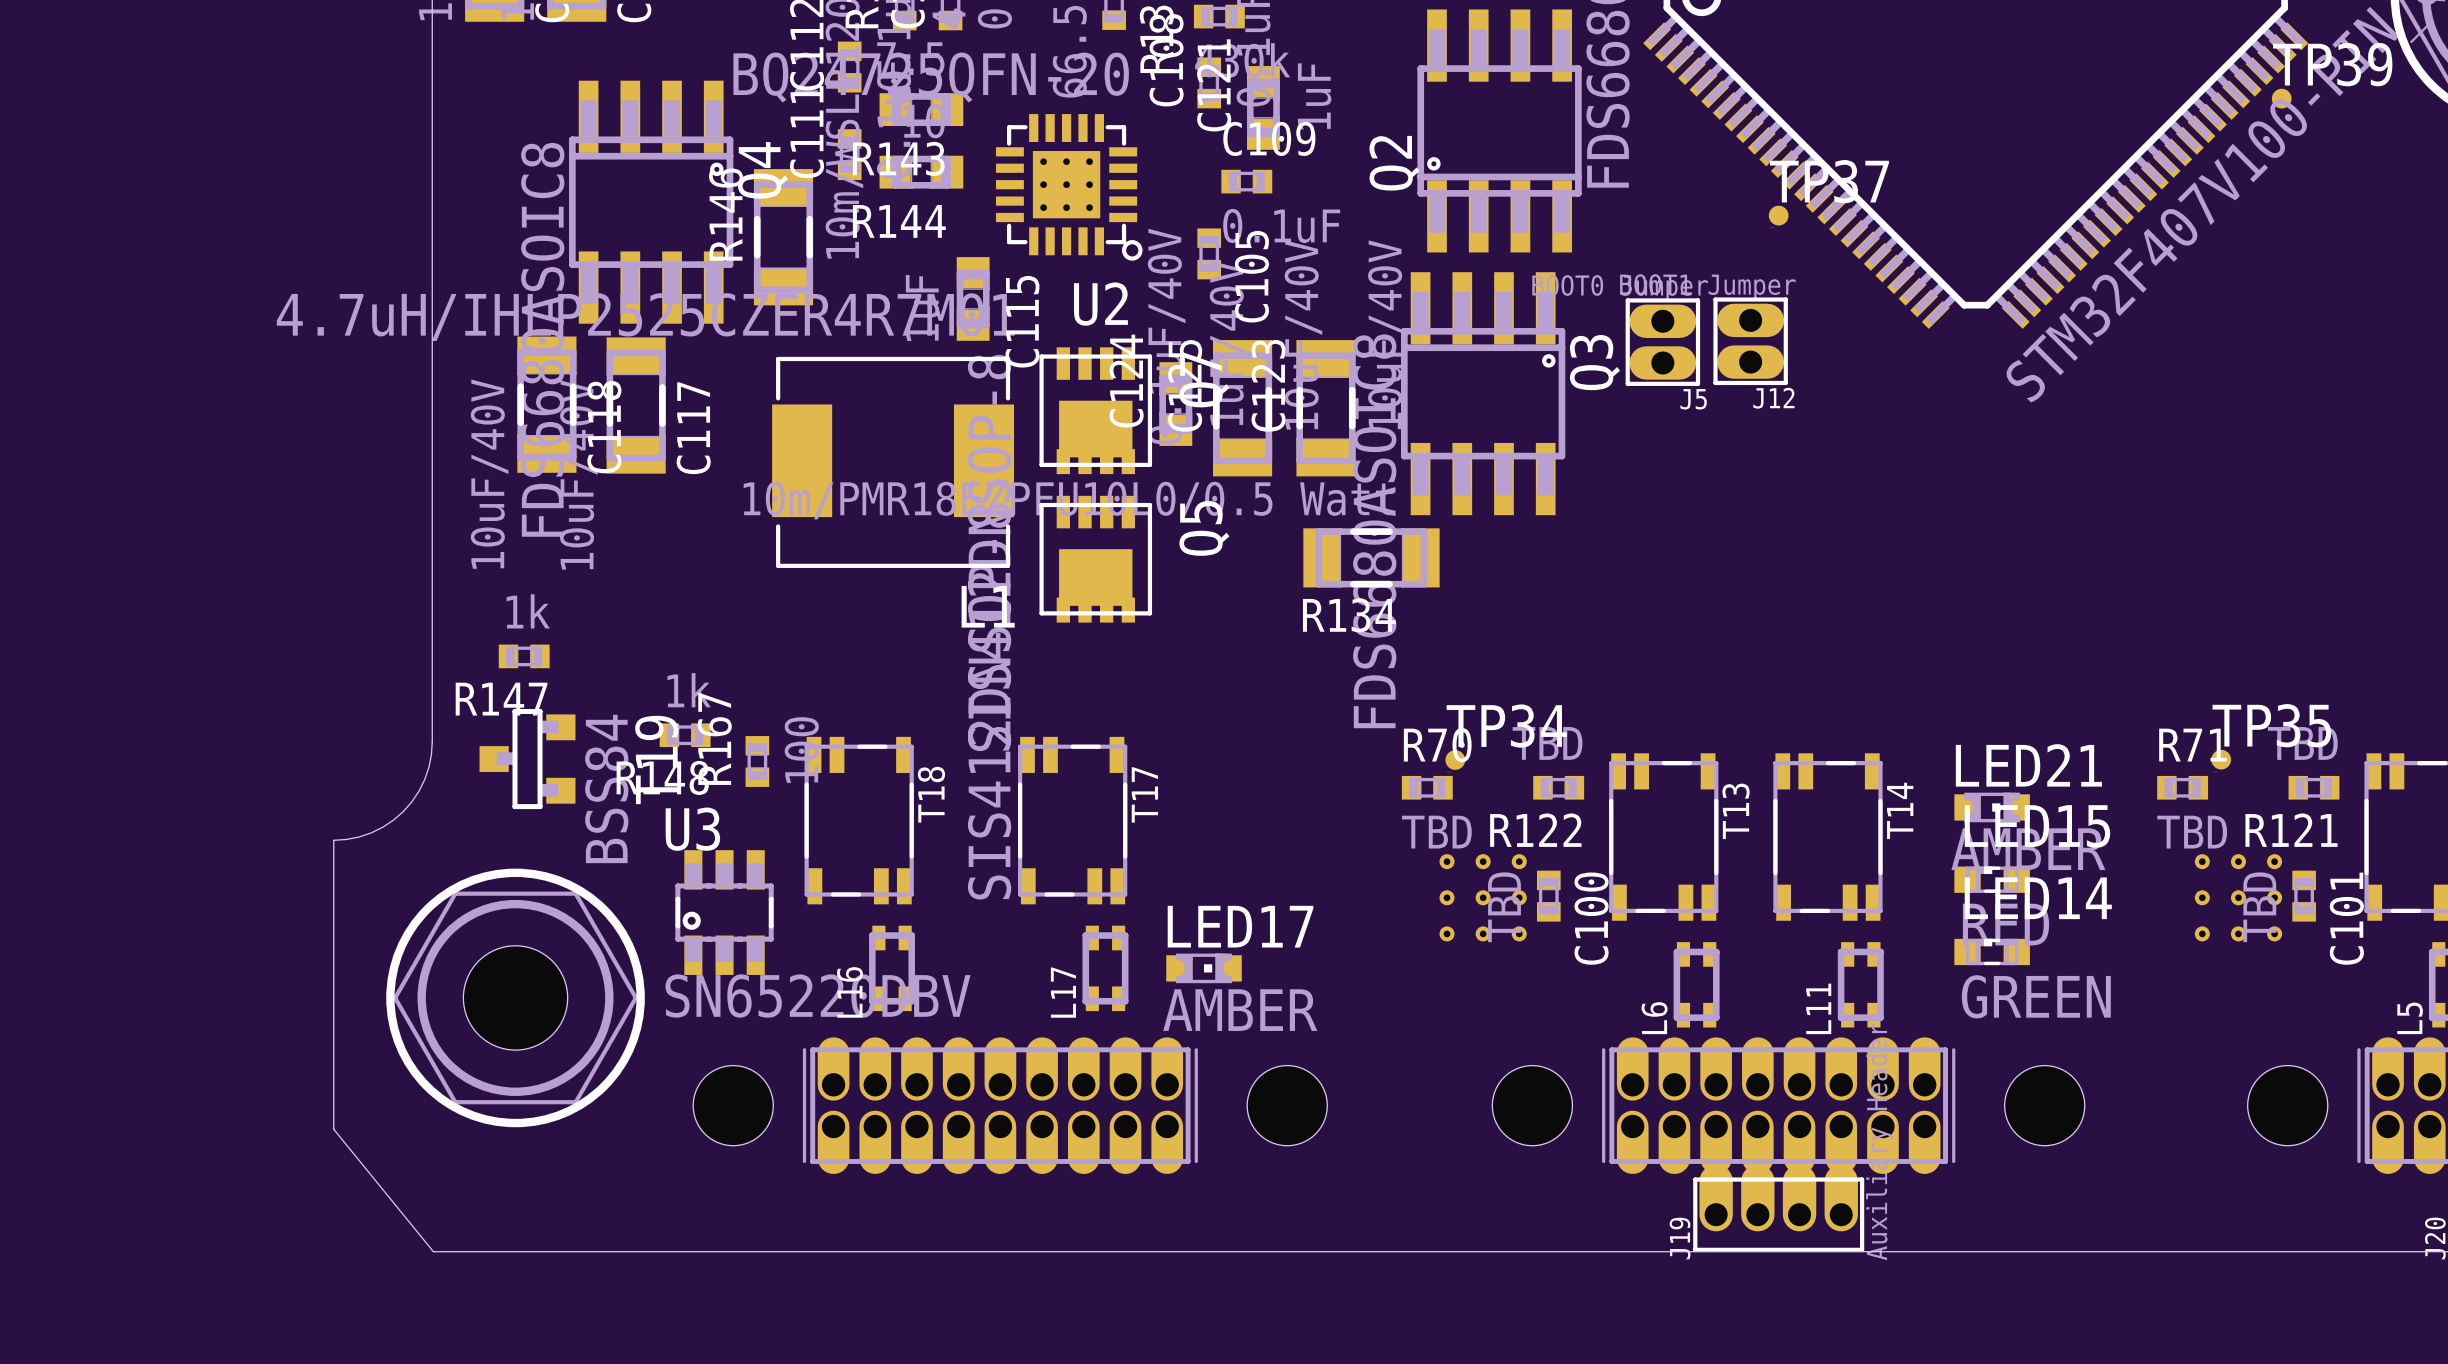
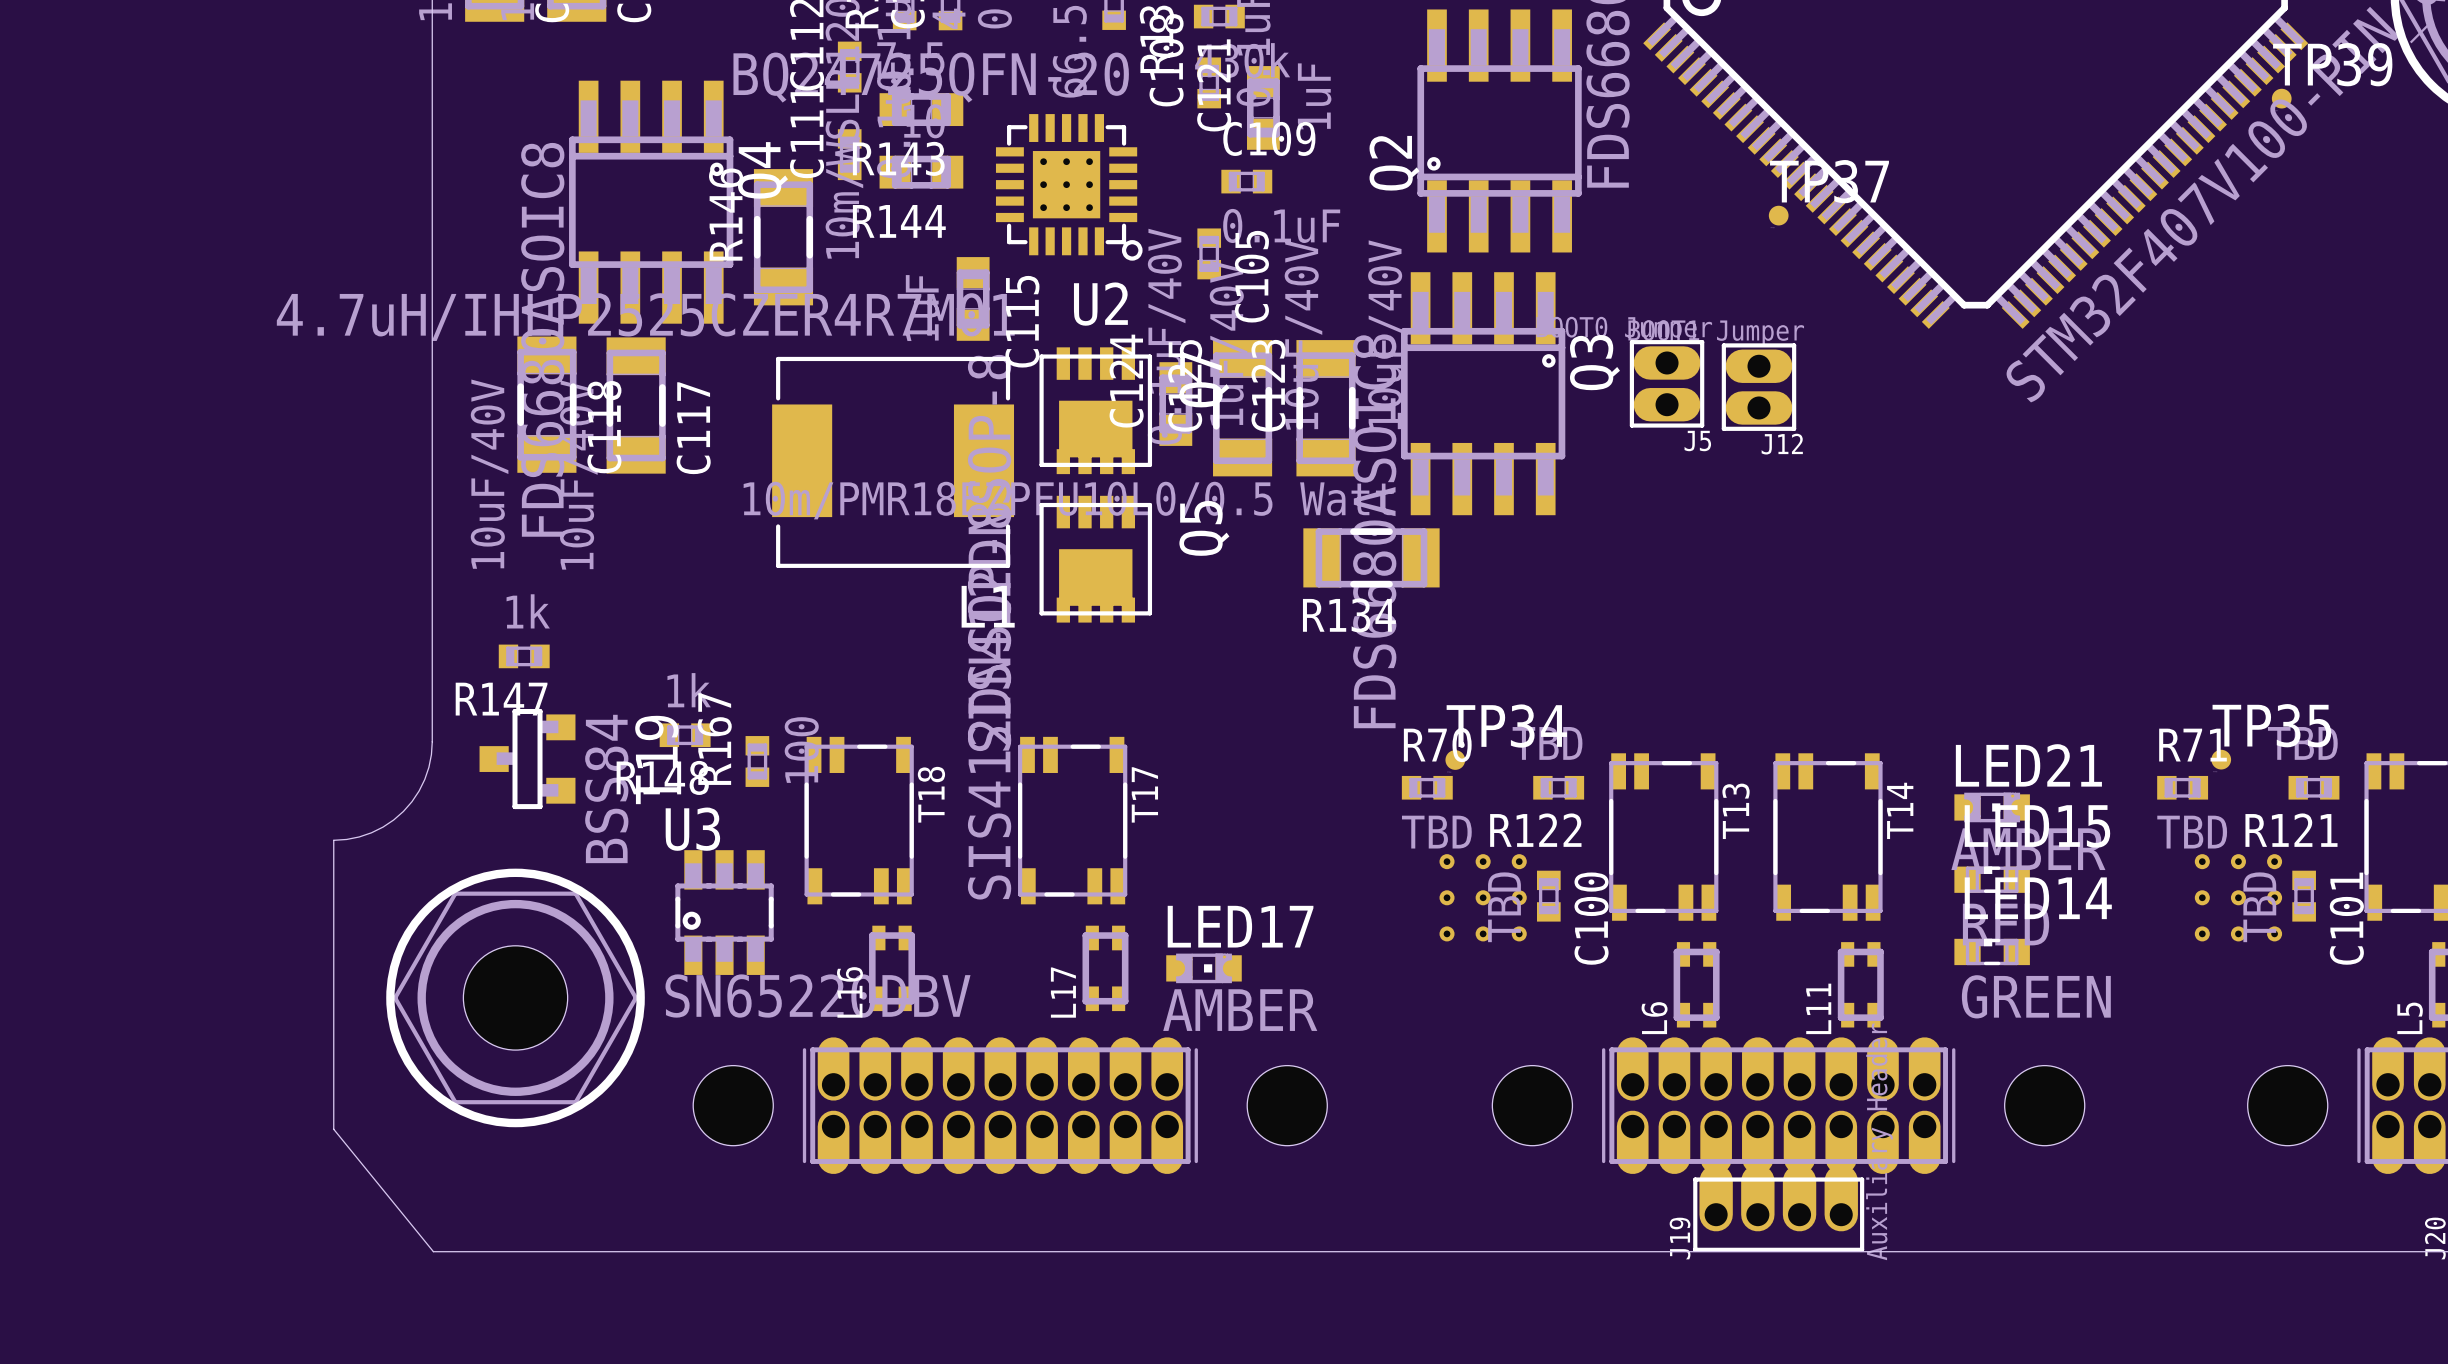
J12 position: (1750, 341) -> (1758, 387)
J5 position: (1662, 342) -> (1667, 383)

